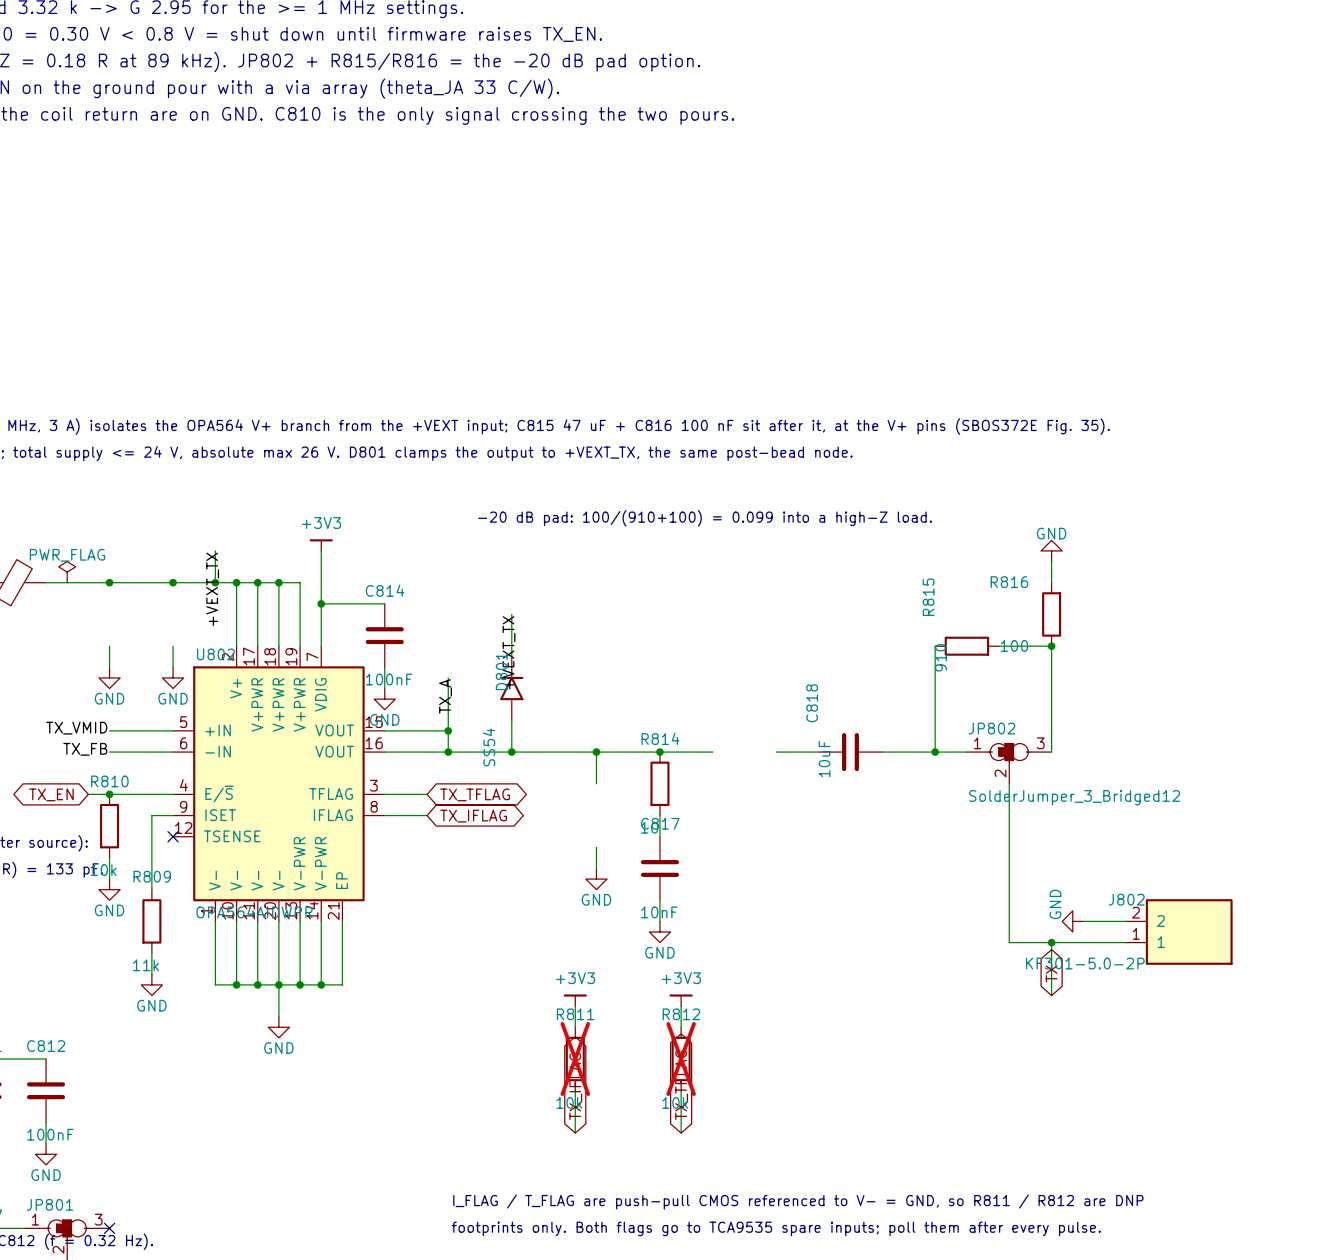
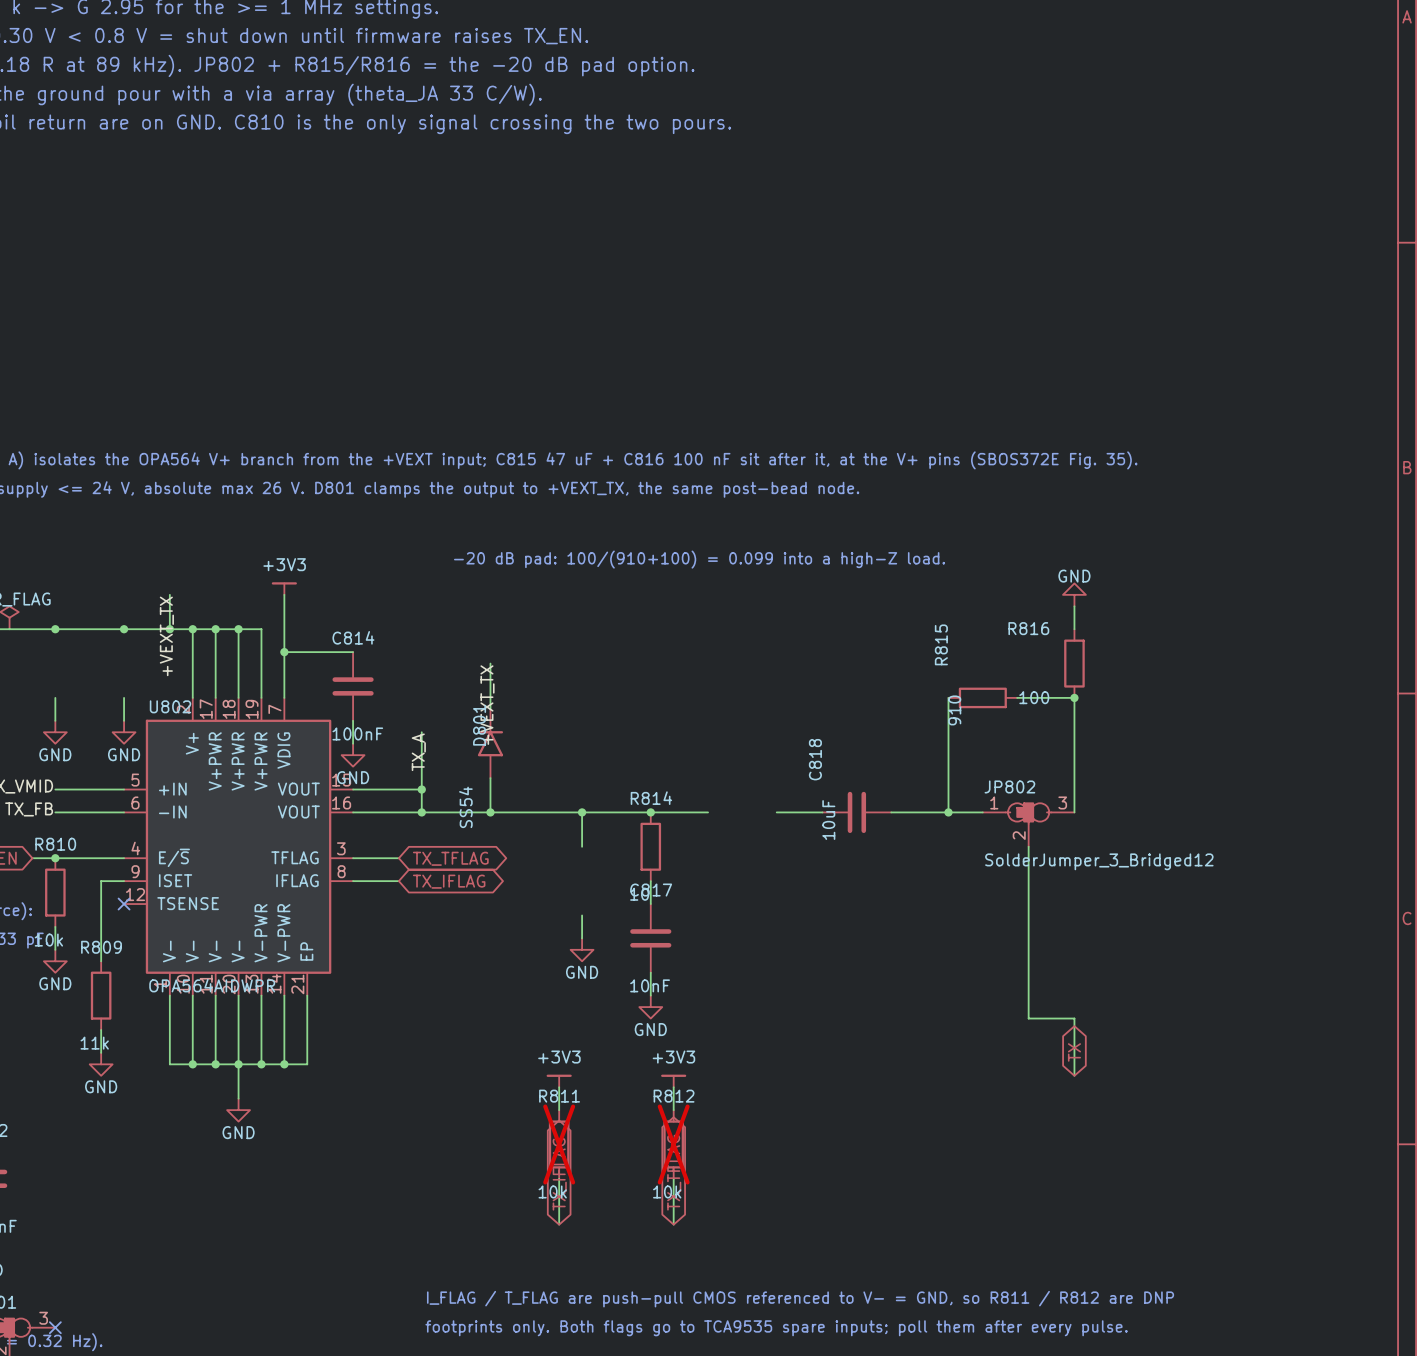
power symbol: GND (1072, 921) -> none
wire: (1083, 921) (1125, 921) -> none
J802: KF301-5.0-2P (1179, 932) -> none
wire: (1051, 942) (1125, 942) -> none
junction: (1051, 942) -> none

